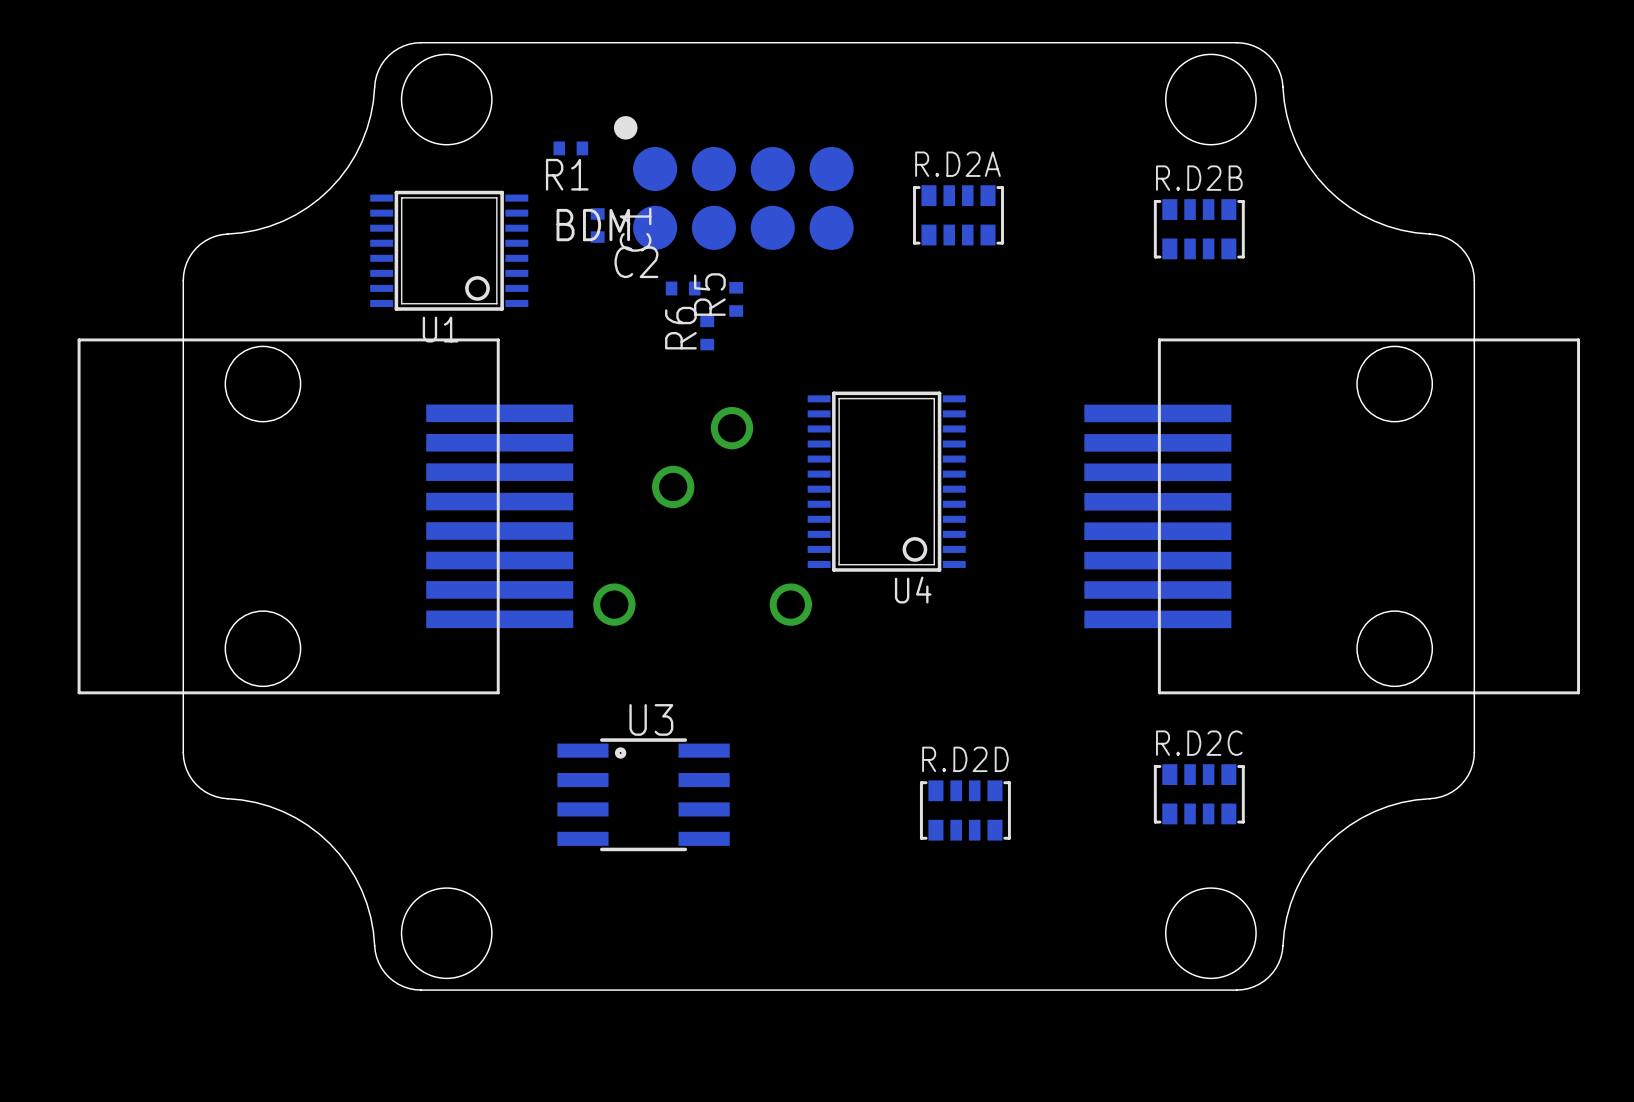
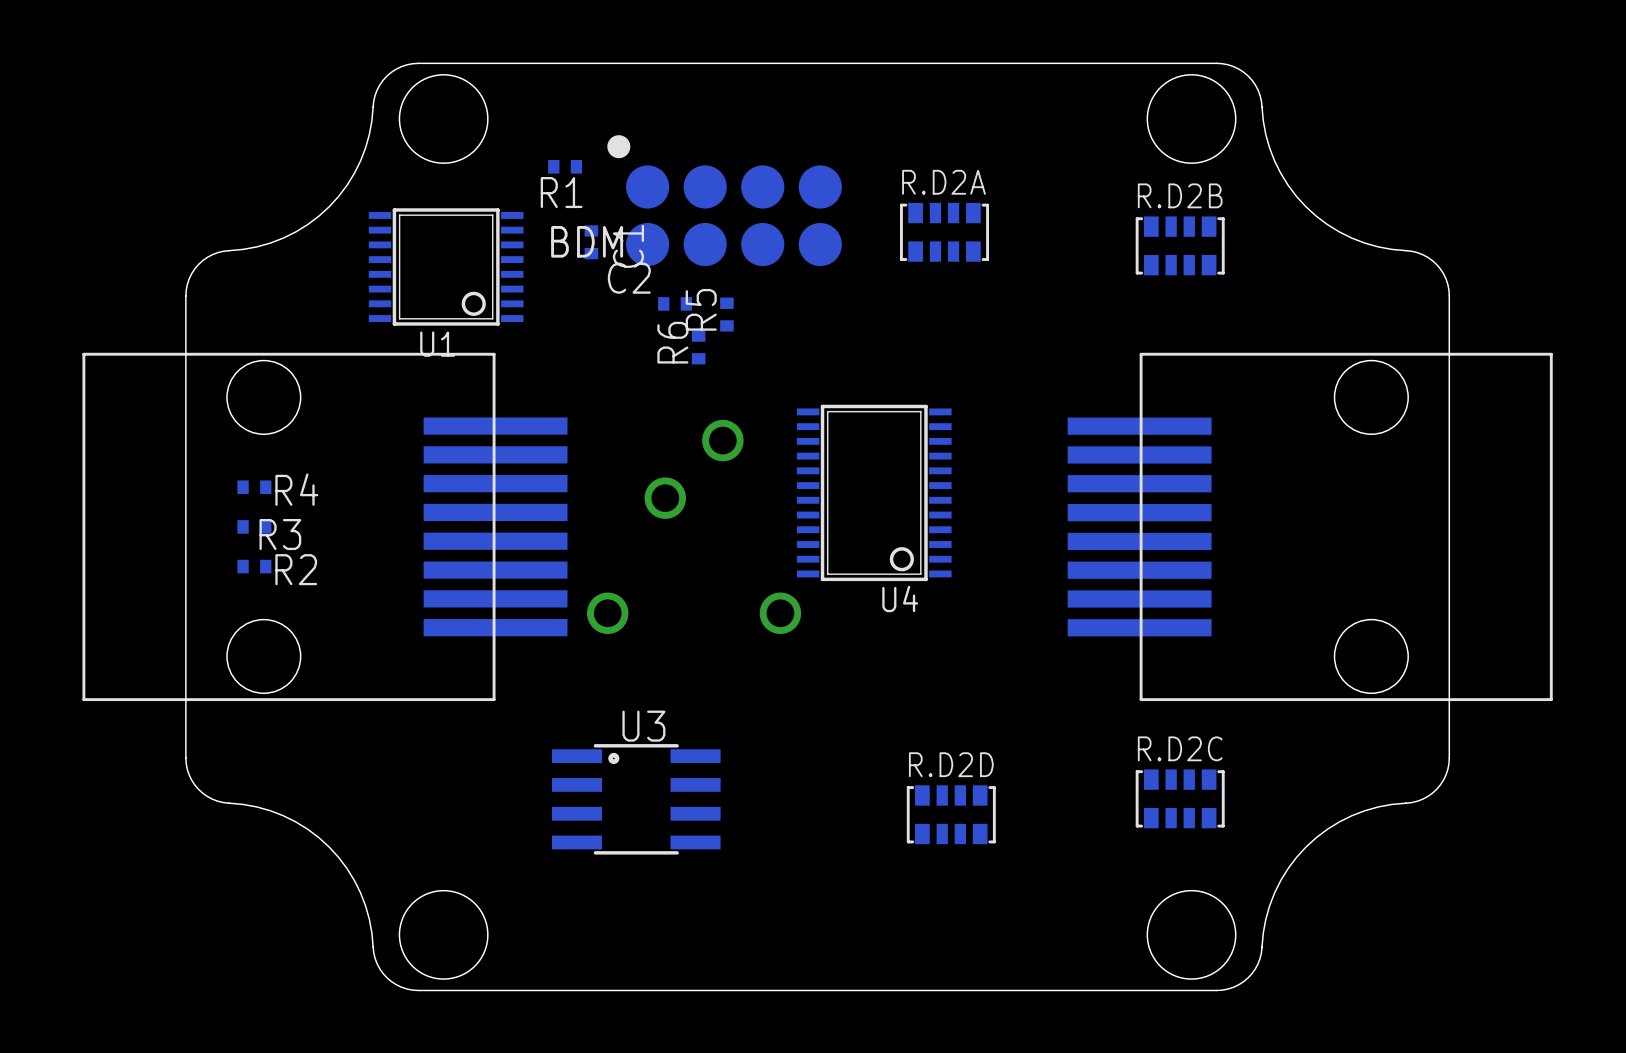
R4: none -> (254, 487)
R3: none -> (254, 526)
R2: none -> (254, 566)

